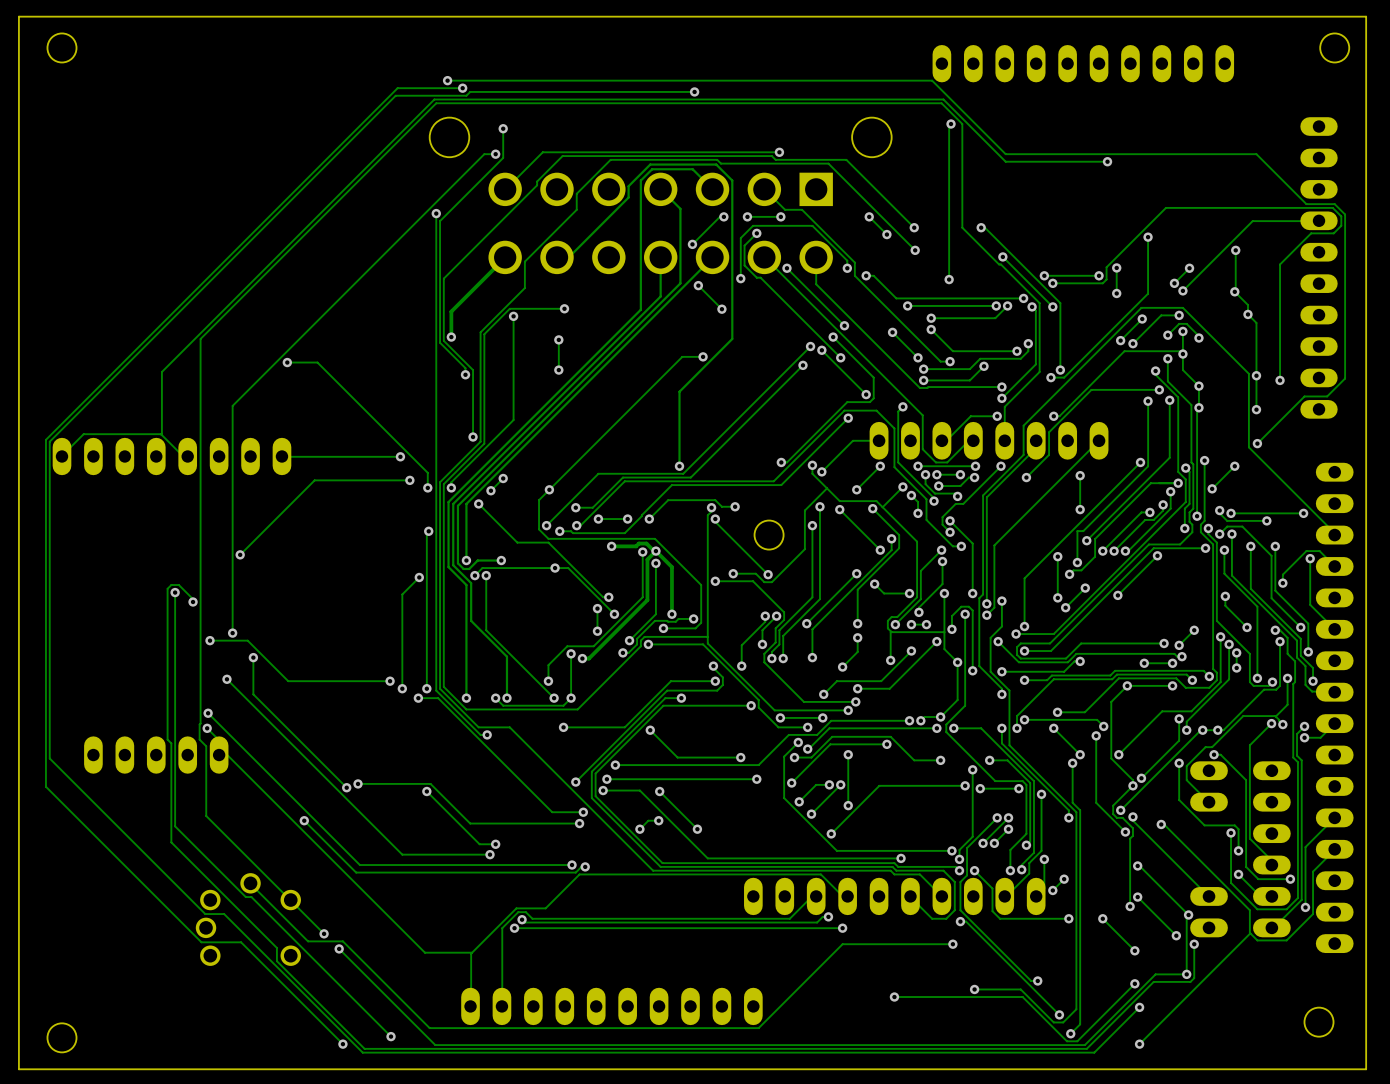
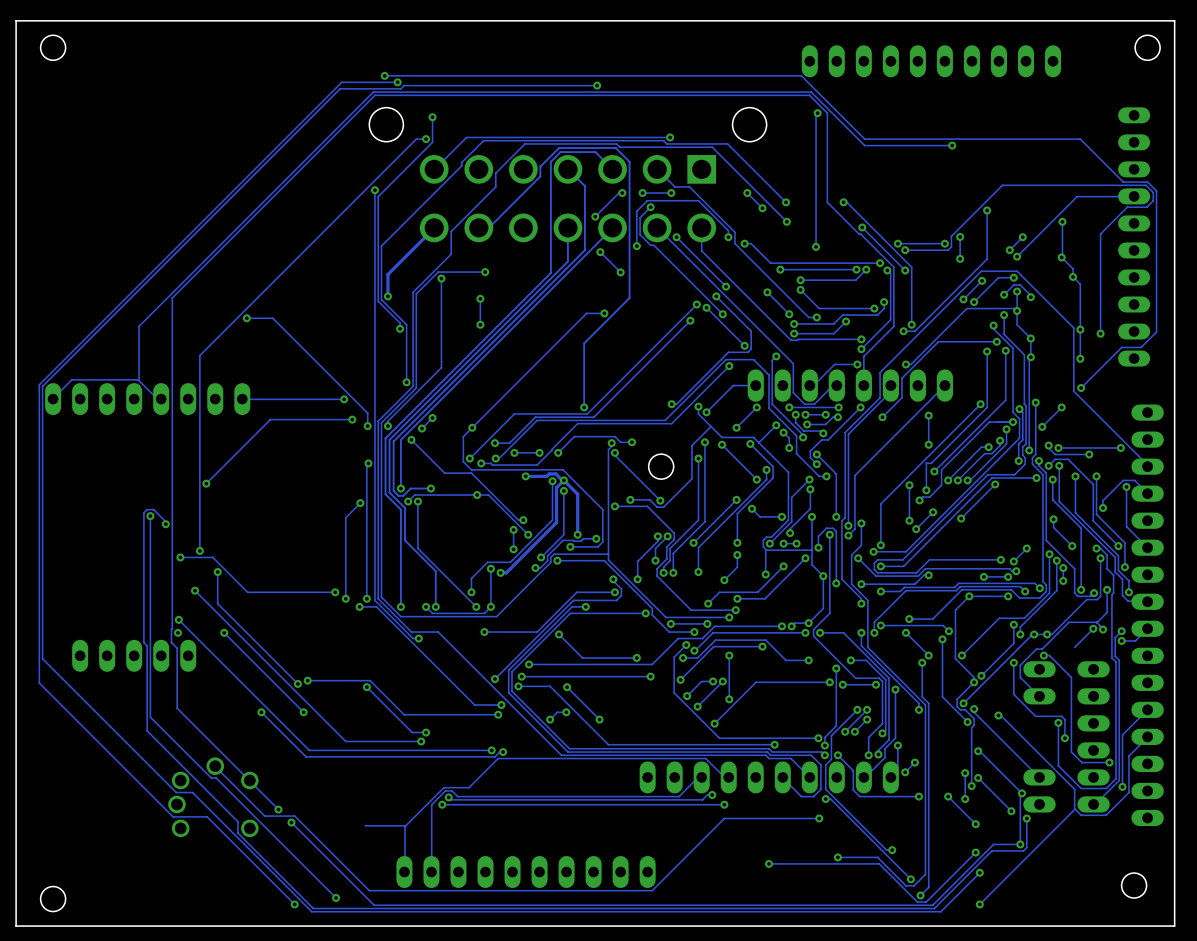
track: (207, 728) (218, 739) (218, 754) (227, 755) (424, 952) -> none
track: none -> (224, 632) (303, 712)
via: none -> (224, 632)
track: (1249, 745) (1249, 838) (1271, 860) (1271, 865) -> none
via: none -> (303, 712)
track: (1238, 874) (1260, 896) (1271, 896) -> none
via: (1238, 874) -> none
track: none -> (965, 773) (965, 799)
via: none -> (965, 773)
via: none -> (965, 799)

